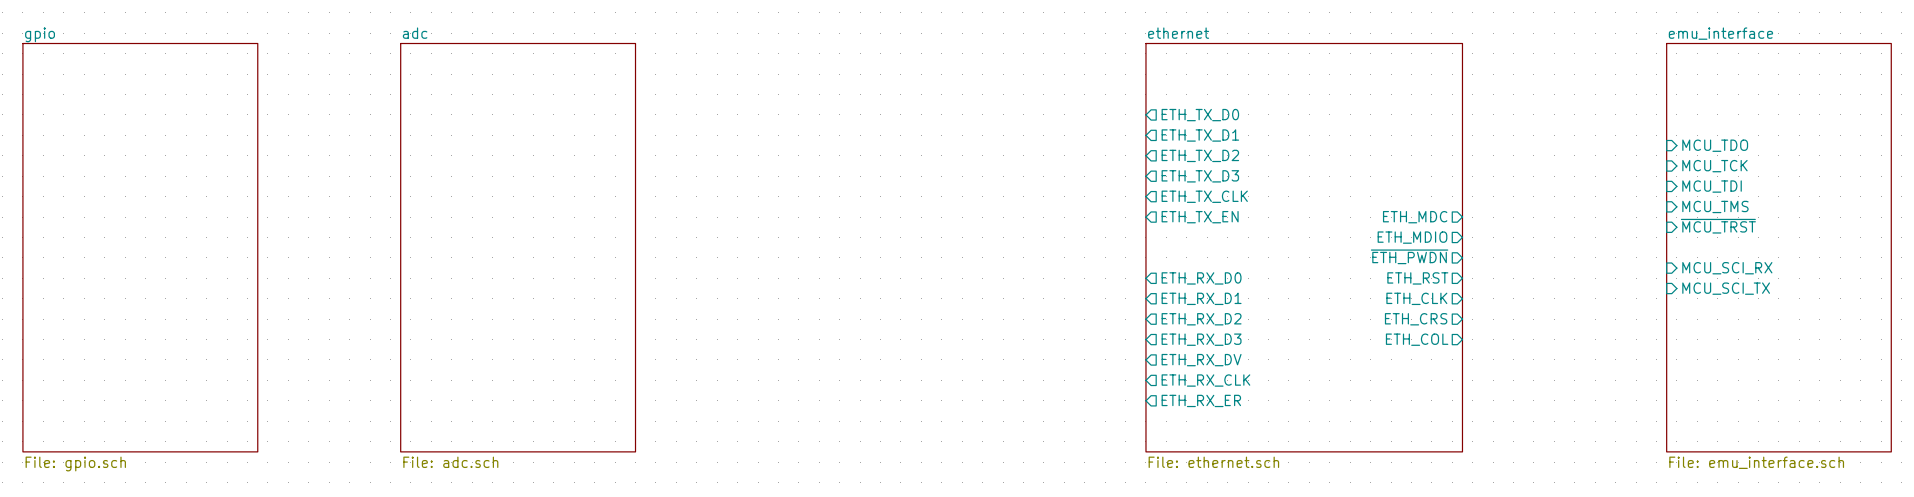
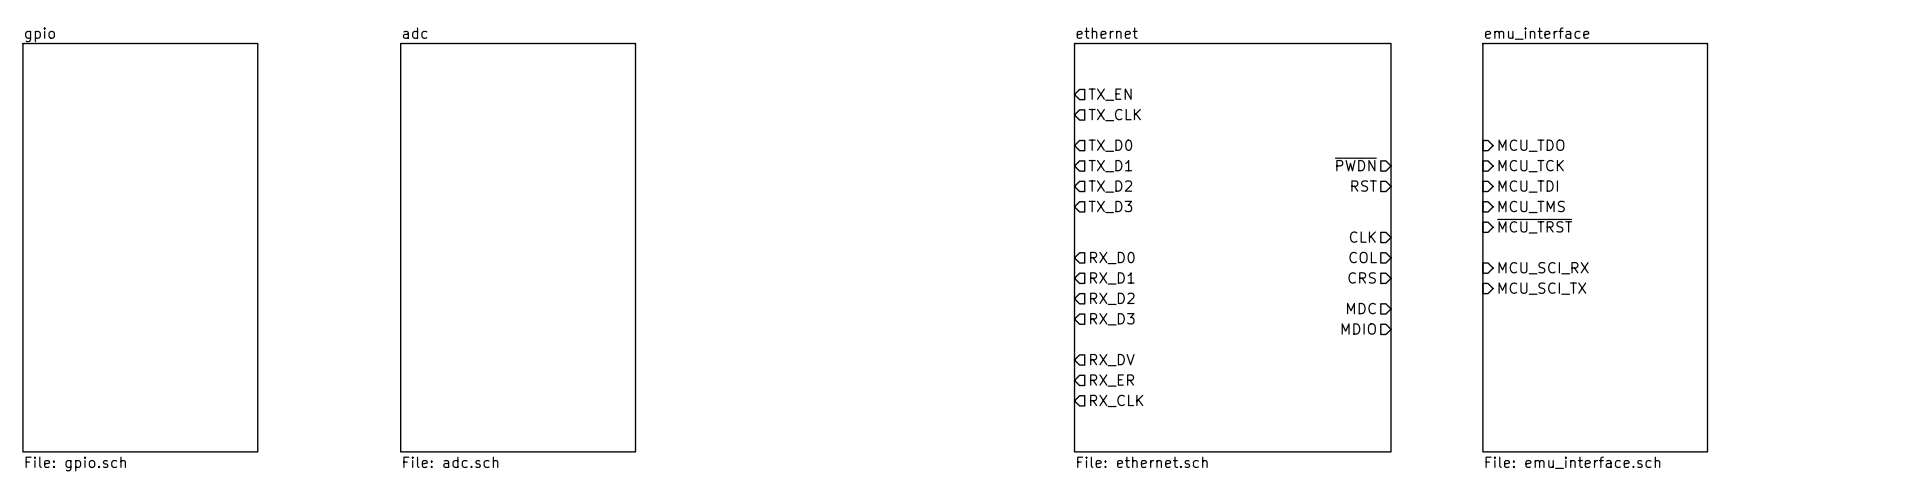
sheet pin: none -> TX_EN (1110, 94)
sheet pin: none -> TX_CLK (1114, 115)
sheet pin: ETH_TX_D0 (1200, 115) -> none
sheet pin: ETH_TX_D1 (1200, 135) -> none
sheet pin: none -> TX_D0 (1110, 145)
sheet pin position: MCU_TDO (1715, 145) -> MCU_TDO (1531, 145)
sheet pin: ETH_TX_D2 (1200, 155) -> none
sheet pin: none -> ~{PWDN} (1355, 164)
sheet pin: none -> TX_D1 (1110, 166)
sheet pin position: MCU_TCK (1714, 166) -> MCU_TCK (1531, 166)
sheet pin: ETH_TX_D3 (1200, 176) -> none
sheet pin: none -> TX_D2 (1110, 186)
sheet pin: none -> RST (1364, 186)
sheet pin position: MCU_TDI (1712, 186) -> MCU_TDI (1528, 186)
sheet pin: ETH_TX_CLK (1204, 196) -> none
sheet pin: none -> TX_D3 (1110, 206)
sheet pin position: MCU_TMS (1715, 206) -> MCU_TMS (1531, 206)
sheet pin: ETH_TX_EN (1200, 217) -> none
sheet pin: ETH_MDC (1415, 217) -> none
sheet pin position: ~{MCU_TRST} (1718, 226) -> ~{MCU_TRST} (1534, 226)
sheet pin: none -> CLK (1362, 237)
sheet pin: ETH_MDIO (1412, 237) -> none
sheet ethernet position: (1304, 247) -> (1232, 247)
sheet emu_interface position: (1778, 247) -> (1595, 247)
sheet pin: ~{ETH_PWDN} (1409, 256) -> none
sheet pin: none -> COL (1363, 257)
sheet pin: none -> RX_D0 (1112, 258)
sheet pin position: MCU_SCI_RX (1727, 268) -> MCU_SCI_RX (1543, 268)
sheet pin: none -> CRS (1362, 277)
sheet pin: none -> RX_D1 (1112, 278)
sheet pin: ETH_RX_D0 (1201, 278) -> none
sheet pin: ETH_RST (1417, 278) -> none
sheet pin position: MCU_SCI_TX (1726, 288) -> MCU_SCI_TX (1542, 288)
sheet pin: none -> RX_D2 (1112, 298)
sheet pin: ETH_RX_D1 (1201, 298) -> none
sheet pin: ETH_CLK (1416, 298) -> none
sheet pin: none -> MDC (1361, 308)
sheet pin: none -> RX_D3 (1112, 319)
sheet pin: ETH_RX_D2 (1201, 319) -> none
sheet pin: ETH_CRS (1416, 319) -> none
sheet pin: none -> MDIO (1358, 328)
sheet pin: ETH_RX_D3 (1201, 339) -> none
sheet pin: ETH_COL (1417, 339) -> none
sheet pin: none -> RX_DV (1112, 360)
sheet pin: ETH_RX_DV (1201, 360) -> none
sheet pin: none -> RX_ER (1112, 380)
sheet pin: ETH_RX_CLK (1205, 380) -> none
sheet pin: none -> RX_CLK (1116, 400)
sheet pin: ETH_RX_ER (1201, 400) -> none

